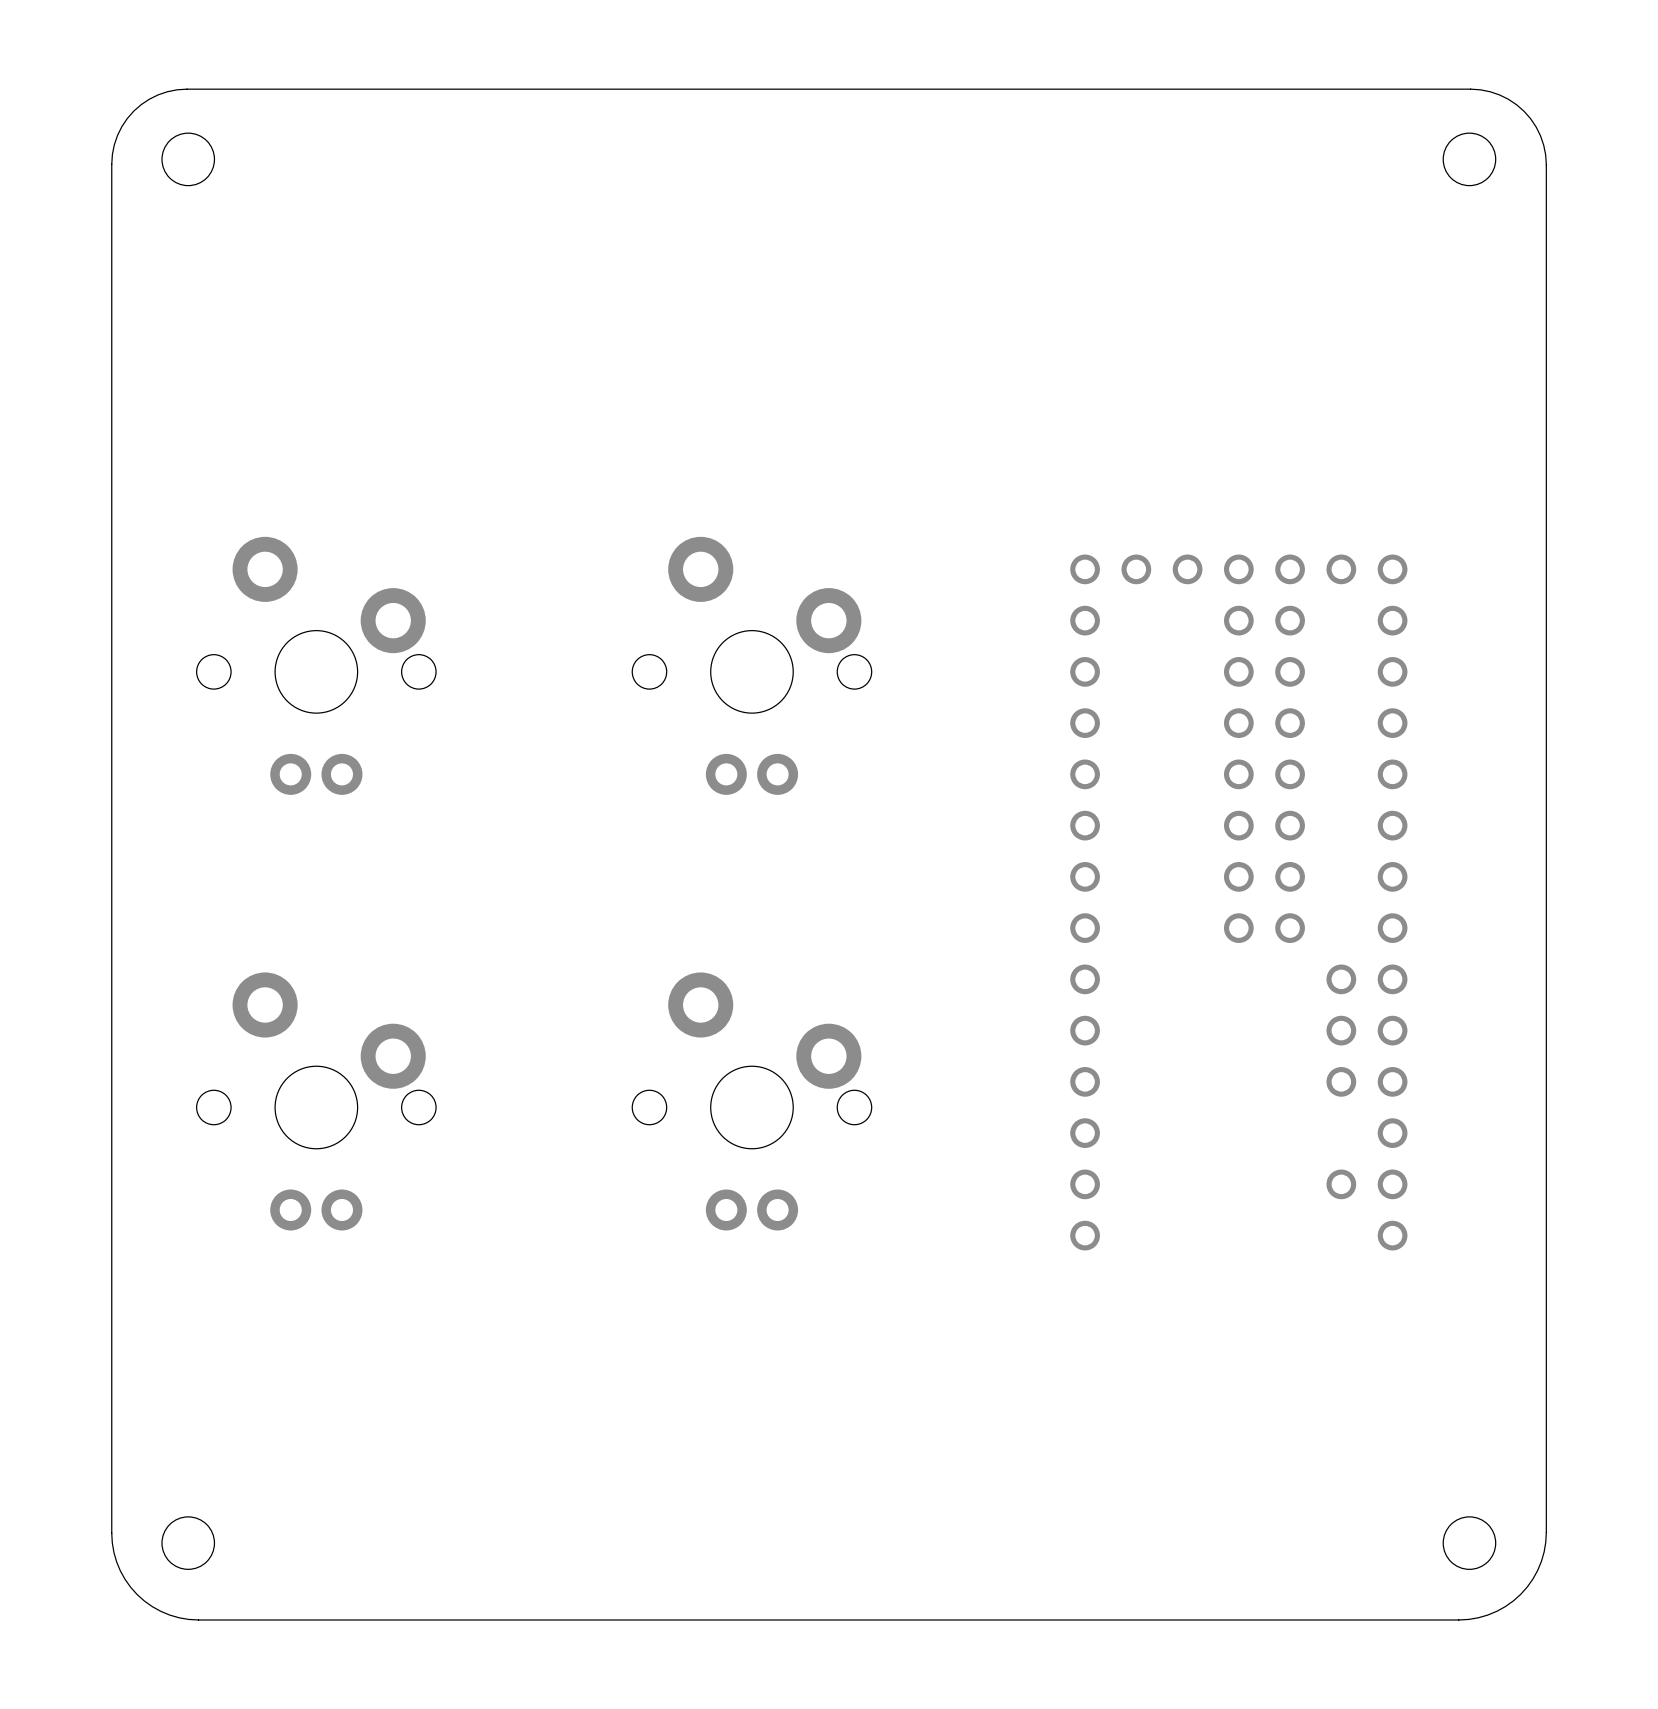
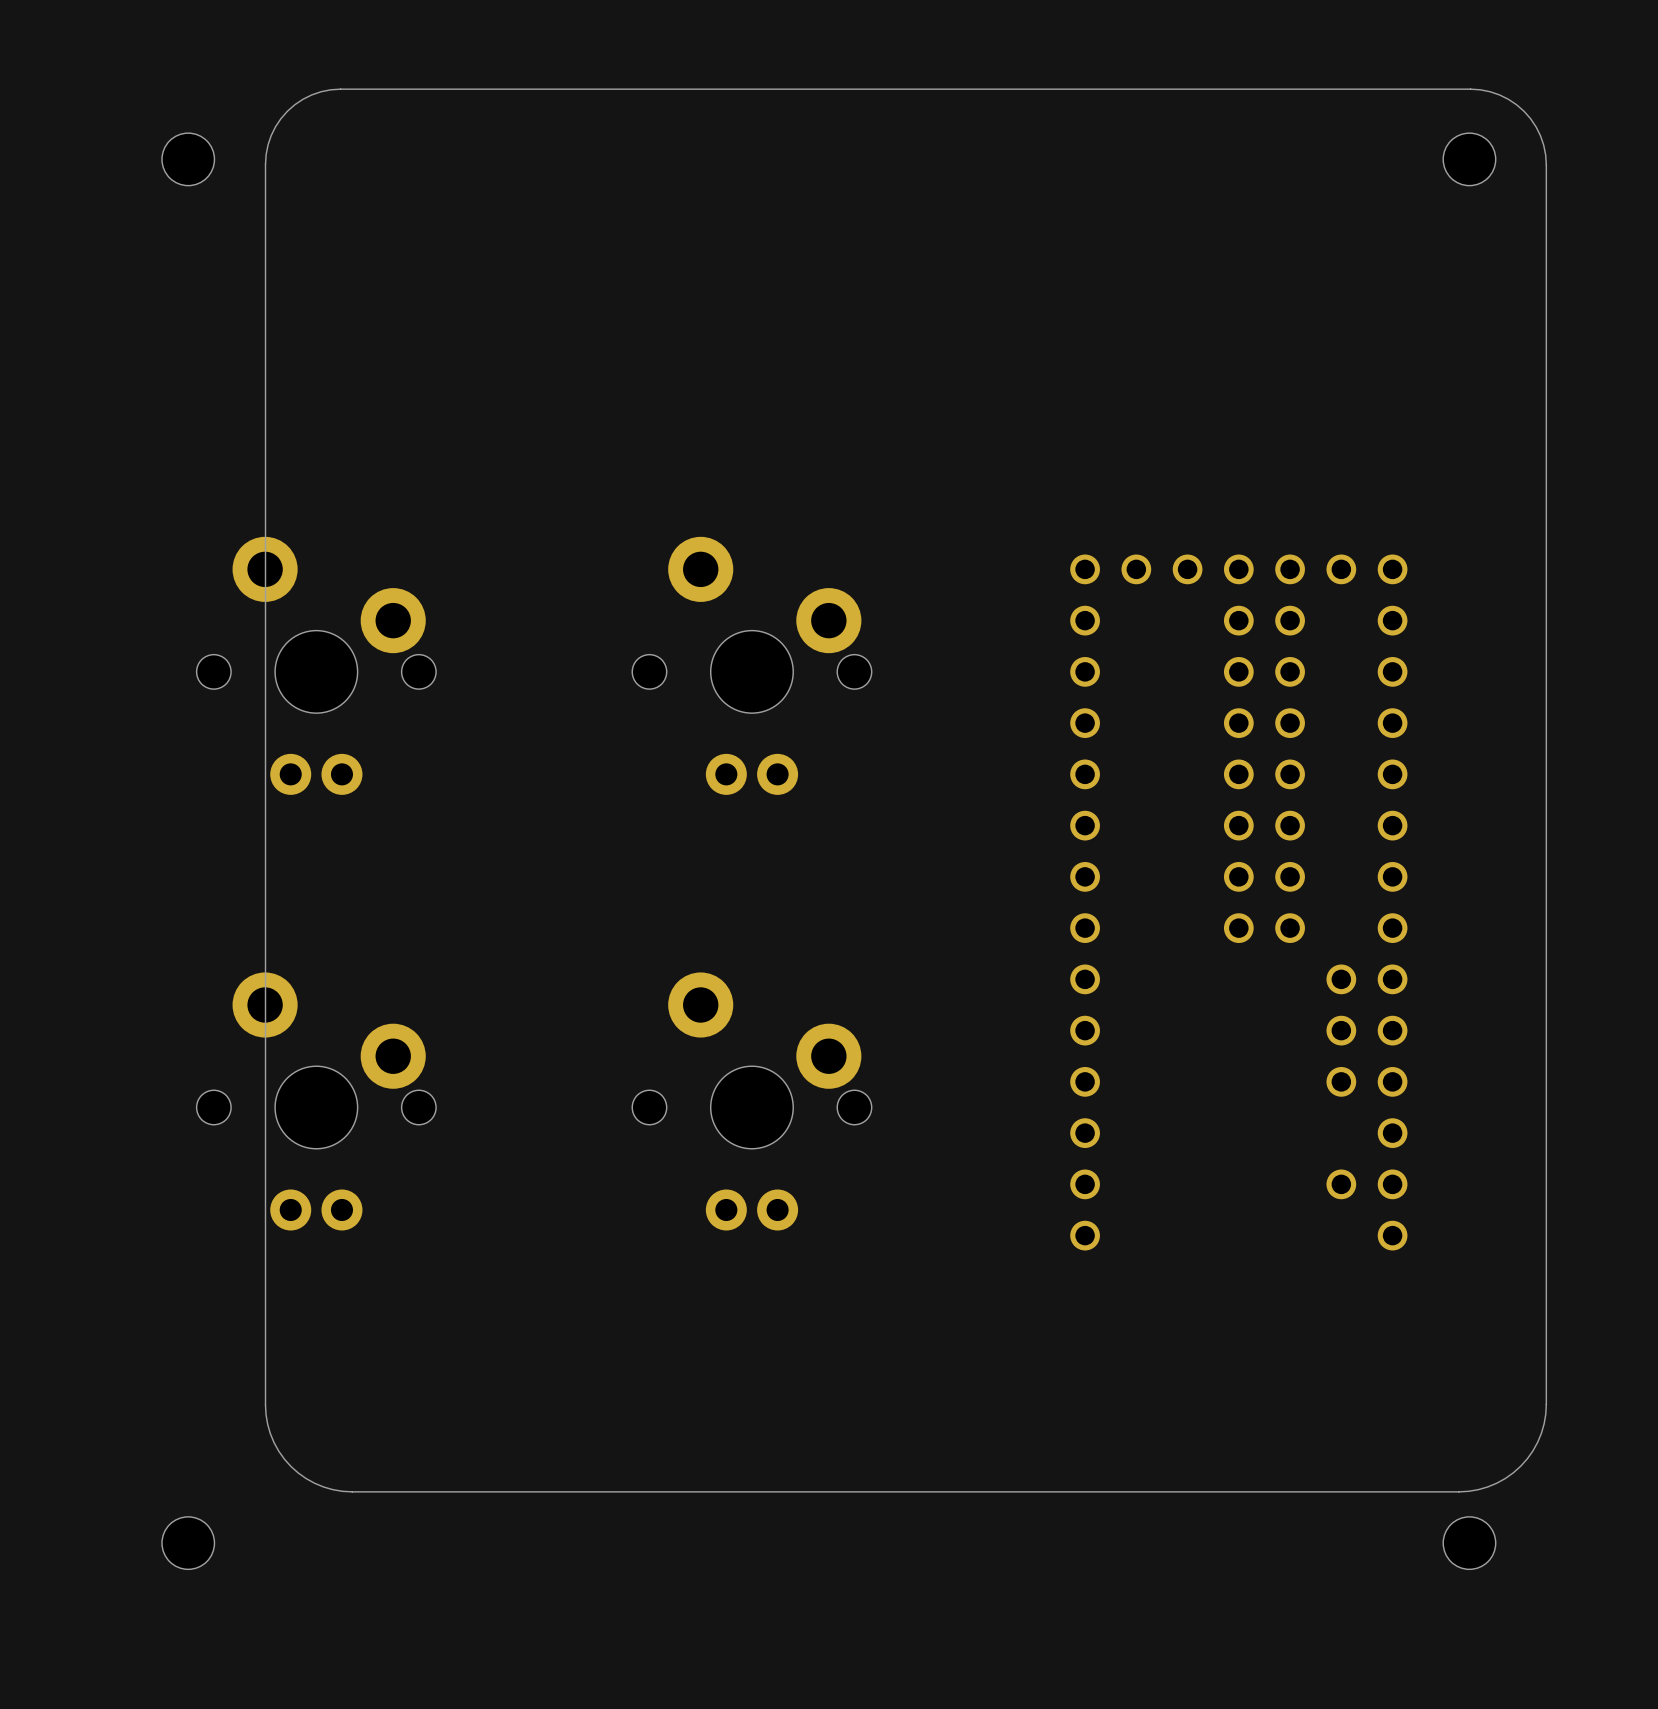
board edge: (340, 89) (186, 89) (167, 91) (149, 99) (133, 111) (117, 135) (112, 154) (111, 1533) (116, 1561) (125, 1579) (137, 1594) (152, 1606) (169, 1615) (198, 1619) (1468, 1619) (1487, 1615) (1513, 1600) (1532, 1579) (1541, 1561) (1546, 1532) (1546, 1404) -> (340, 89) (311, 94) (287, 111) (271, 135) (265, 164) (265, 1405) (270, 1433) (278, 1451) (290, 1466) (306, 1478) (323, 1486) (352, 1491) (1458, 1491) (1487, 1486) (1505, 1478) (1520, 1466) (1532, 1450) (1541, 1433) (1546, 1404)

